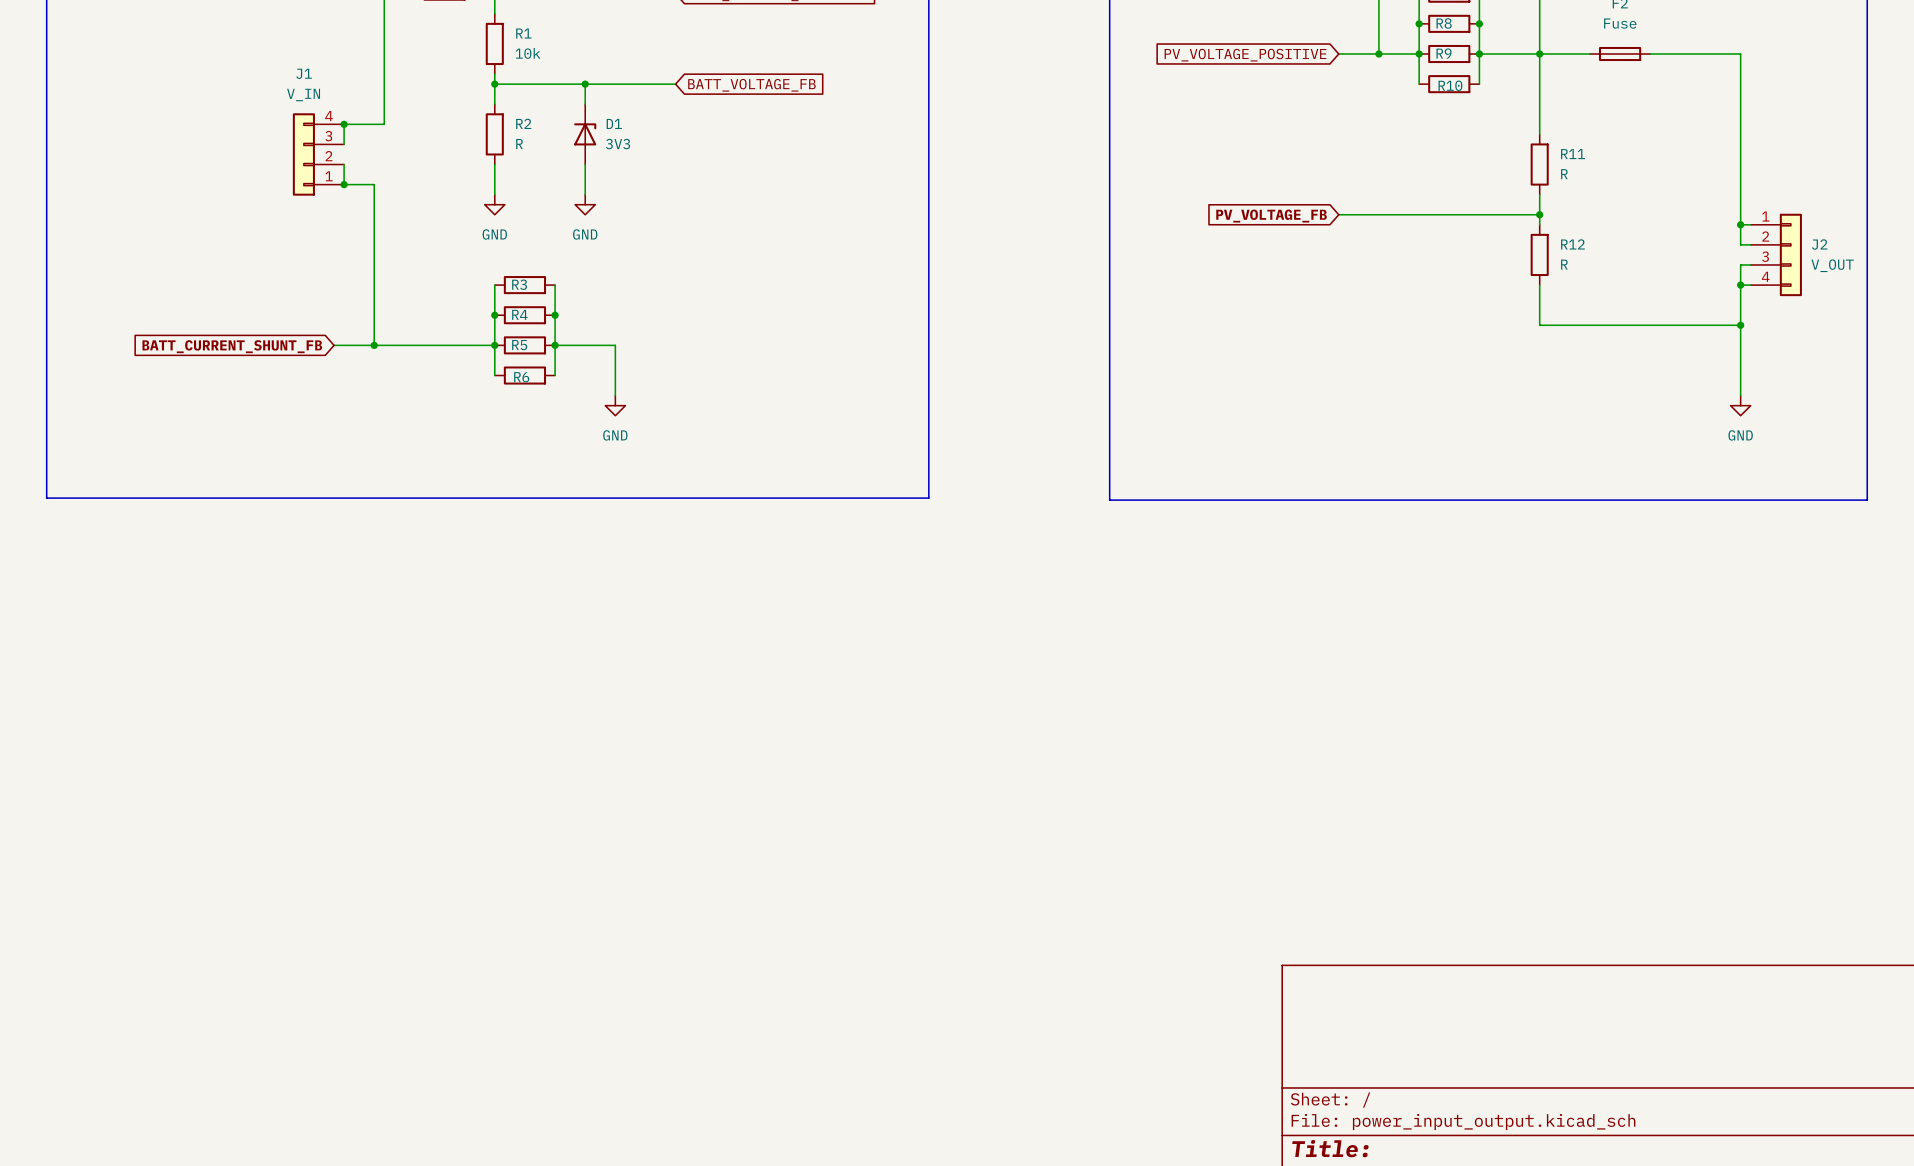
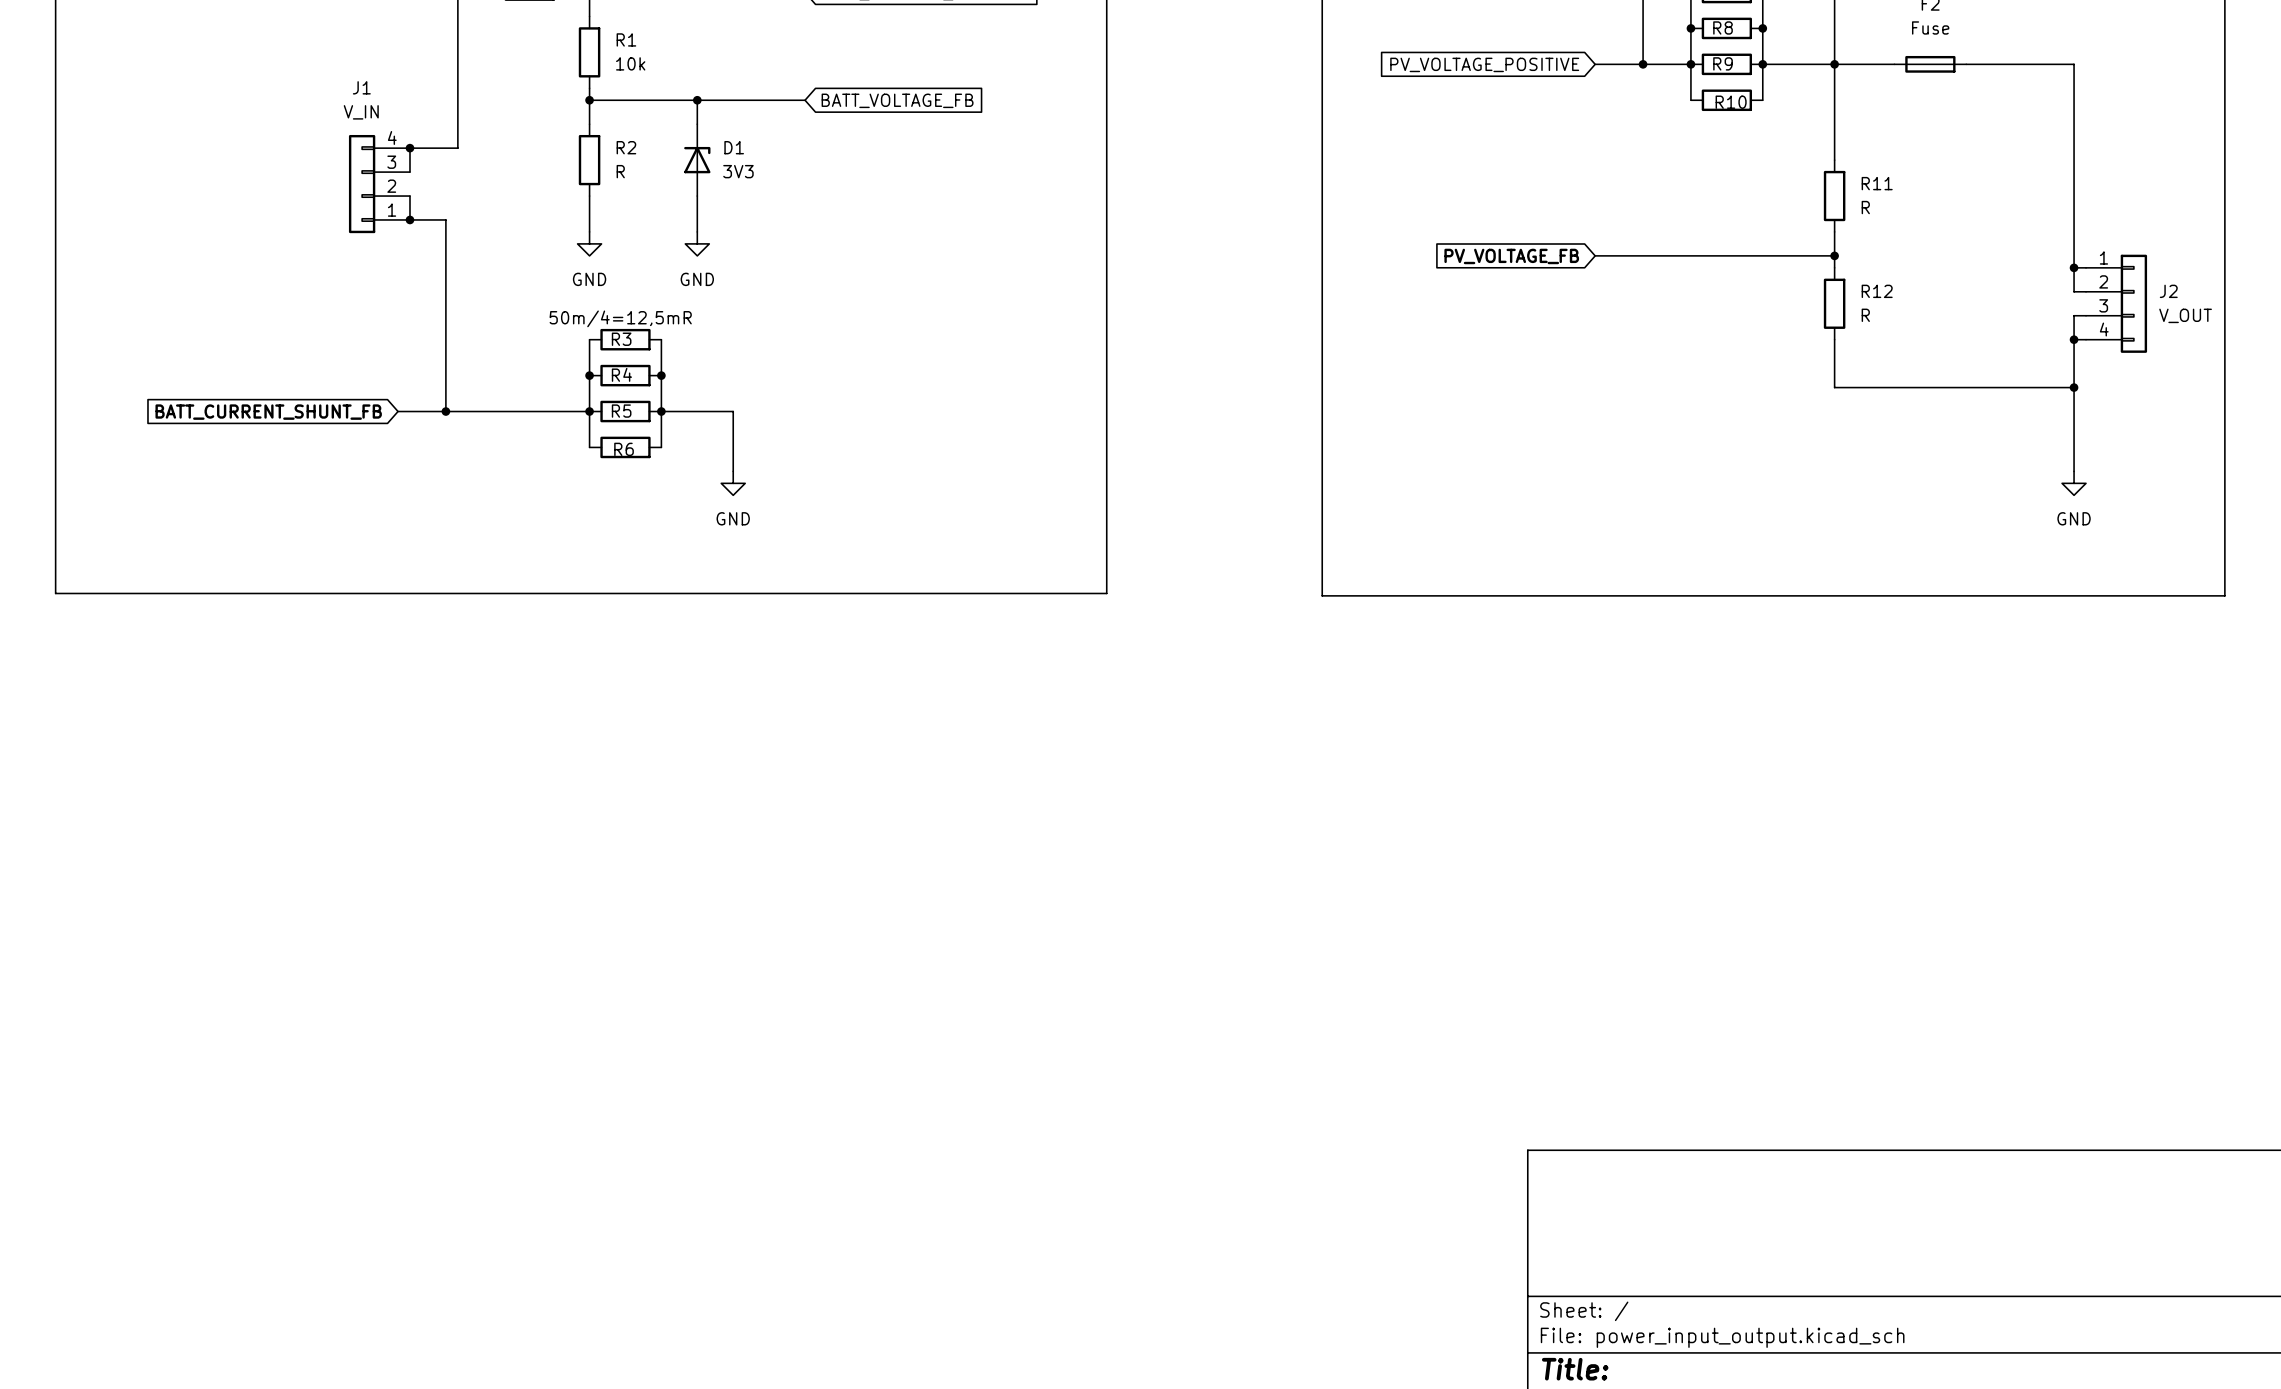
text: none -> 50m/4=12,5mR (620, 318)

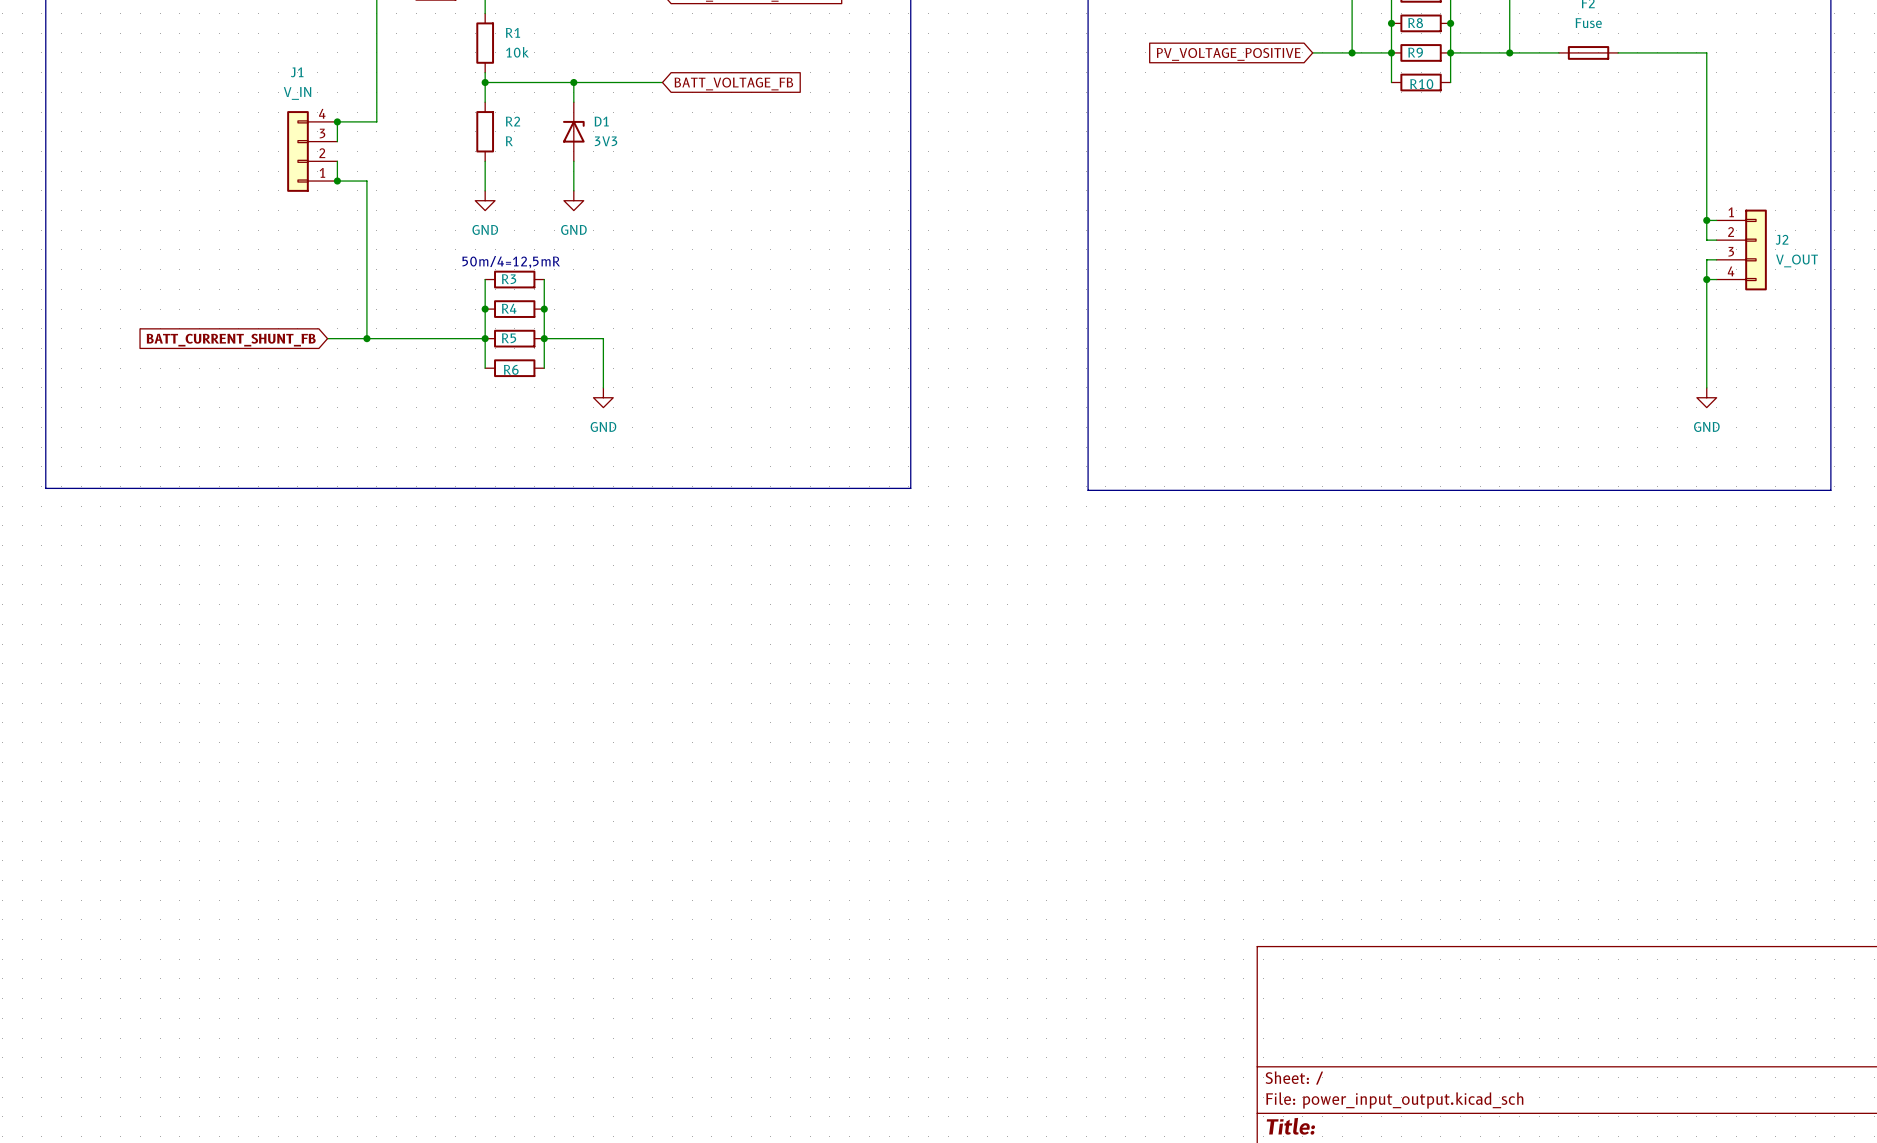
wire: (1834, 64) (1834, 160) -> none
R11: R (1834, 196) -> none
wire: (1834, 231) (1834, 267) -> none
wire: (1595, 255) (1834, 255) -> none
junction: (1834, 255) -> none
global label: PV_VOLTAGE_FB (1511, 256) -> none
R12: R (1834, 303) -> none
wire: (1834, 339) (1834, 387) (2074, 387) -> none
junction: (2074, 387) -> none

